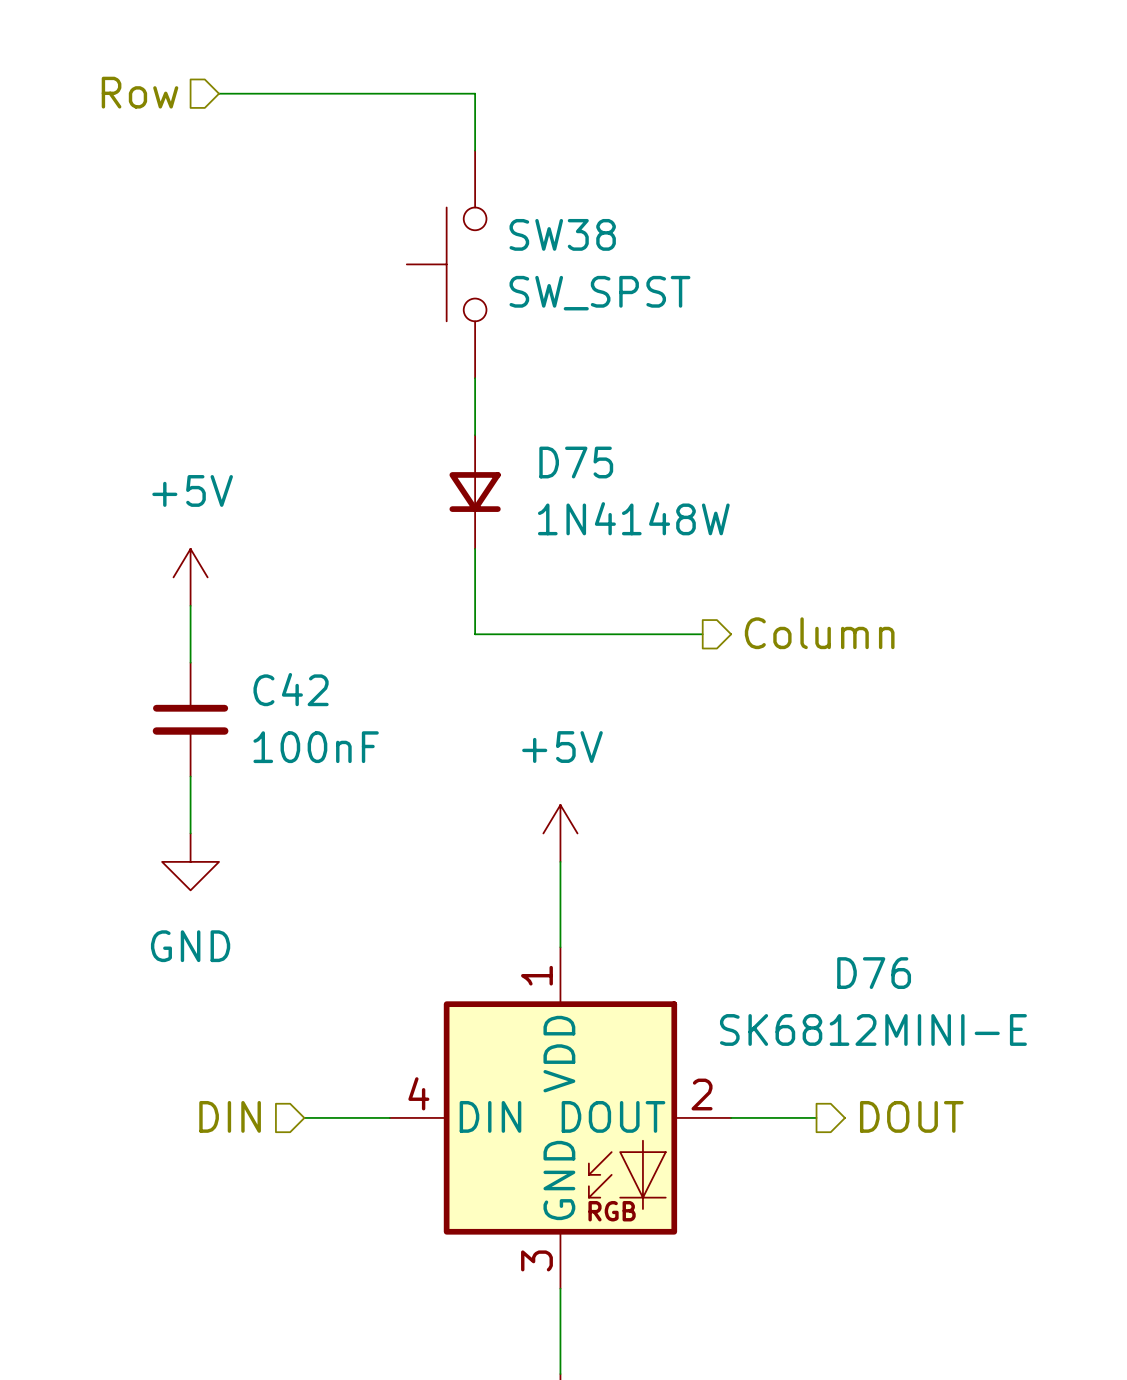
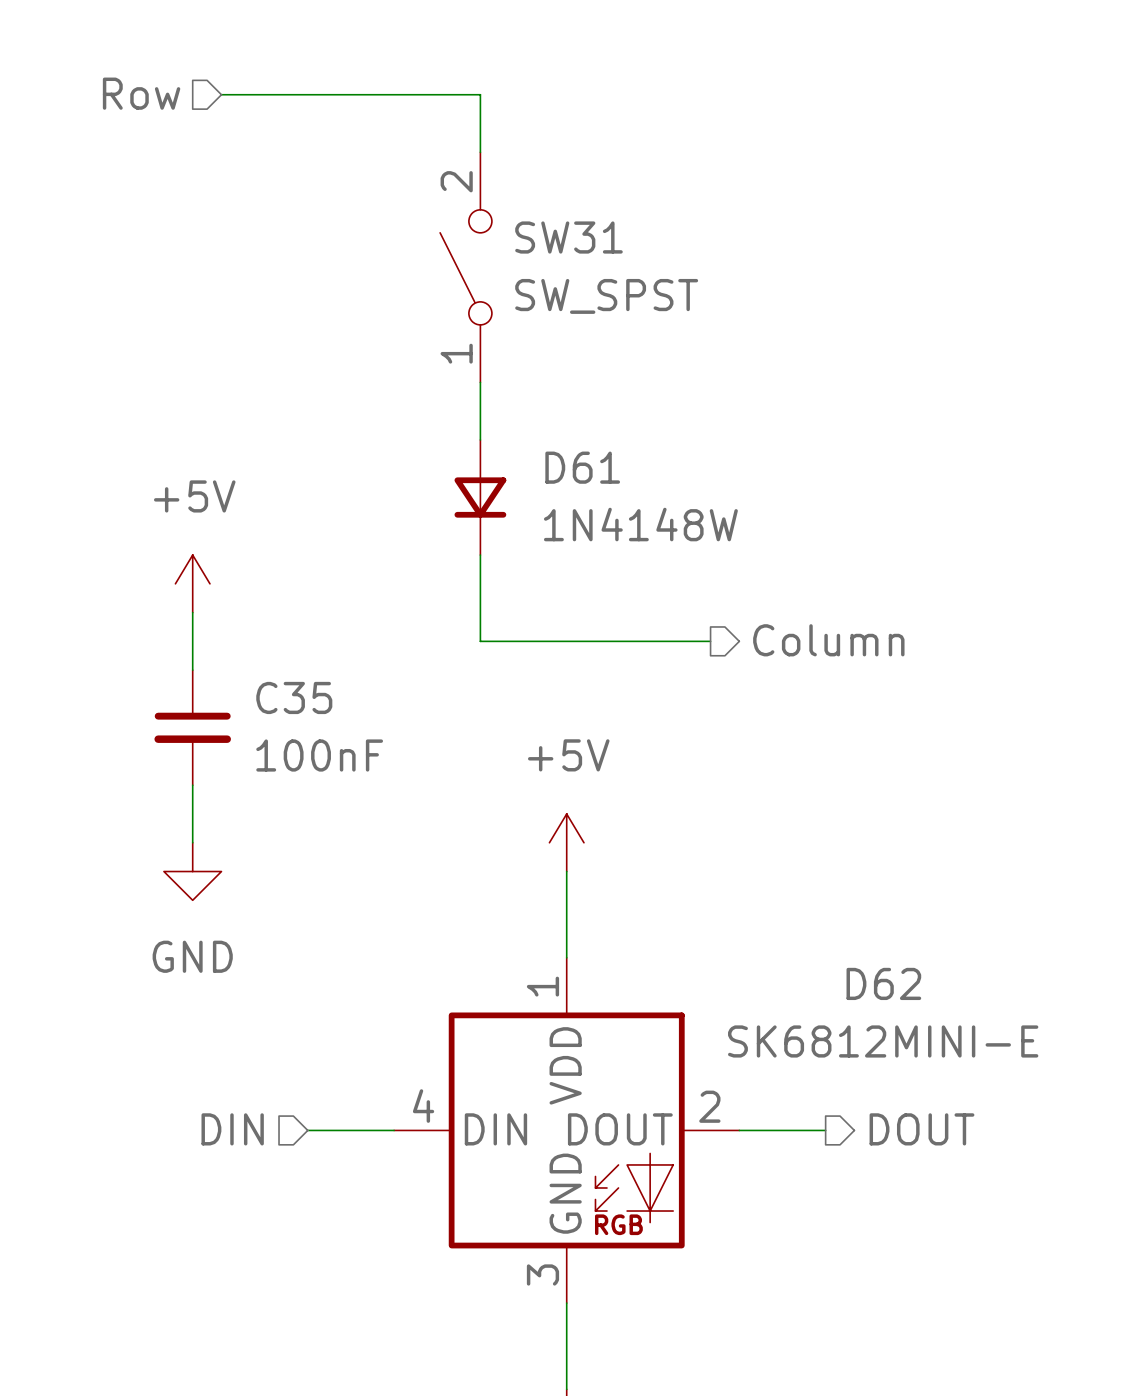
SW38: SW_SPST (446, 264) -> none
SW31: none -> SW_SPST (466, 267)
D75 name: D75 (576, 462) -> D61 (582, 467)
C42 name: C42 (291, 689) -> C35 (294, 697)
D76 name: D76 (874, 973) -> D62 (883, 983)

